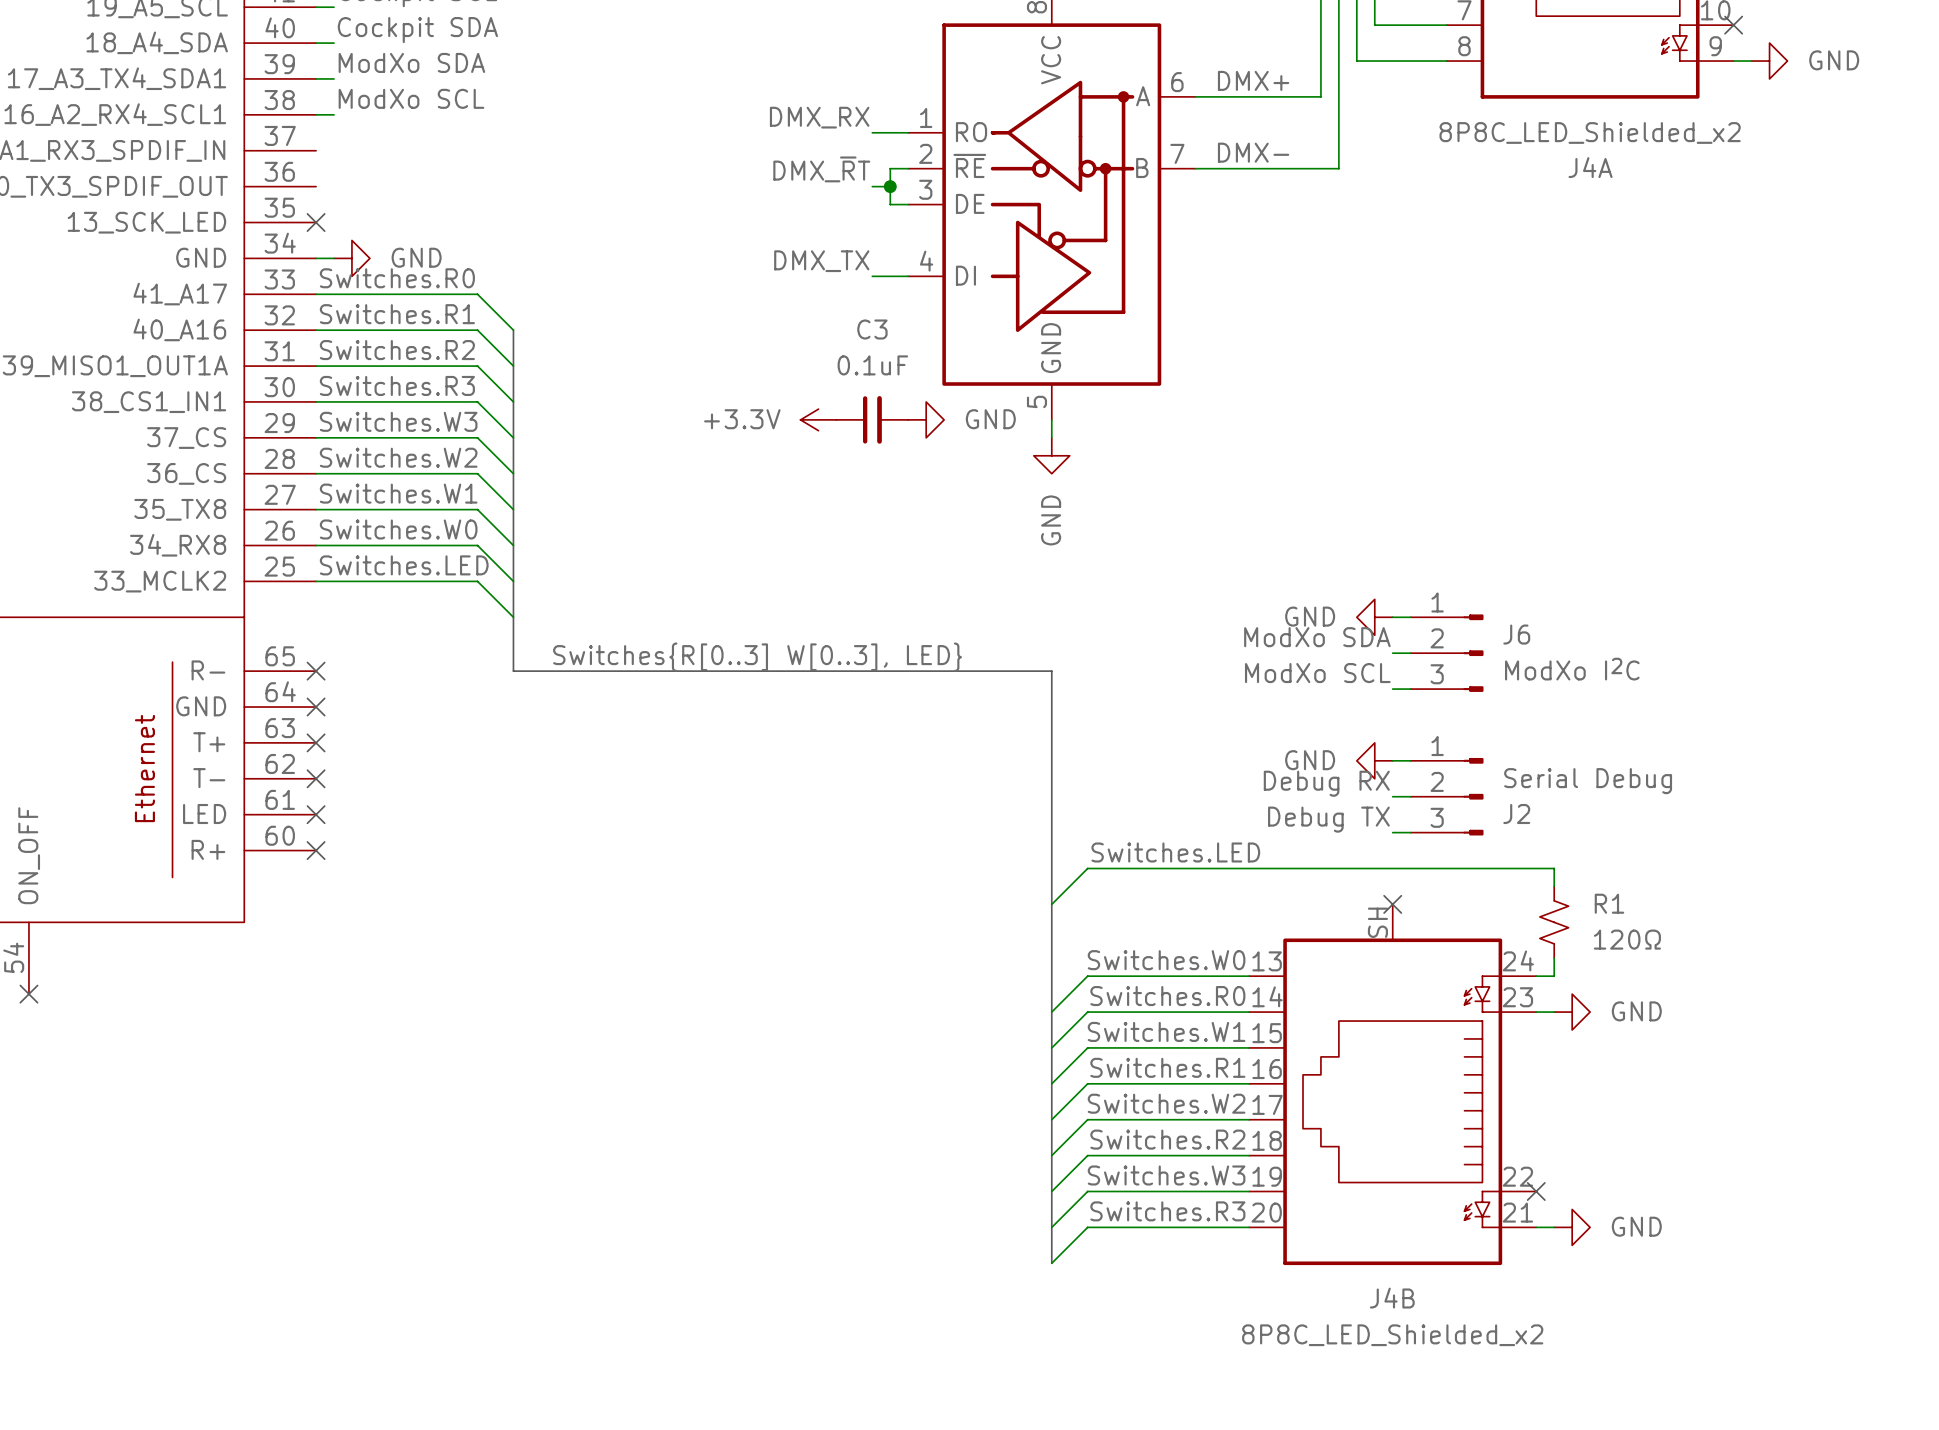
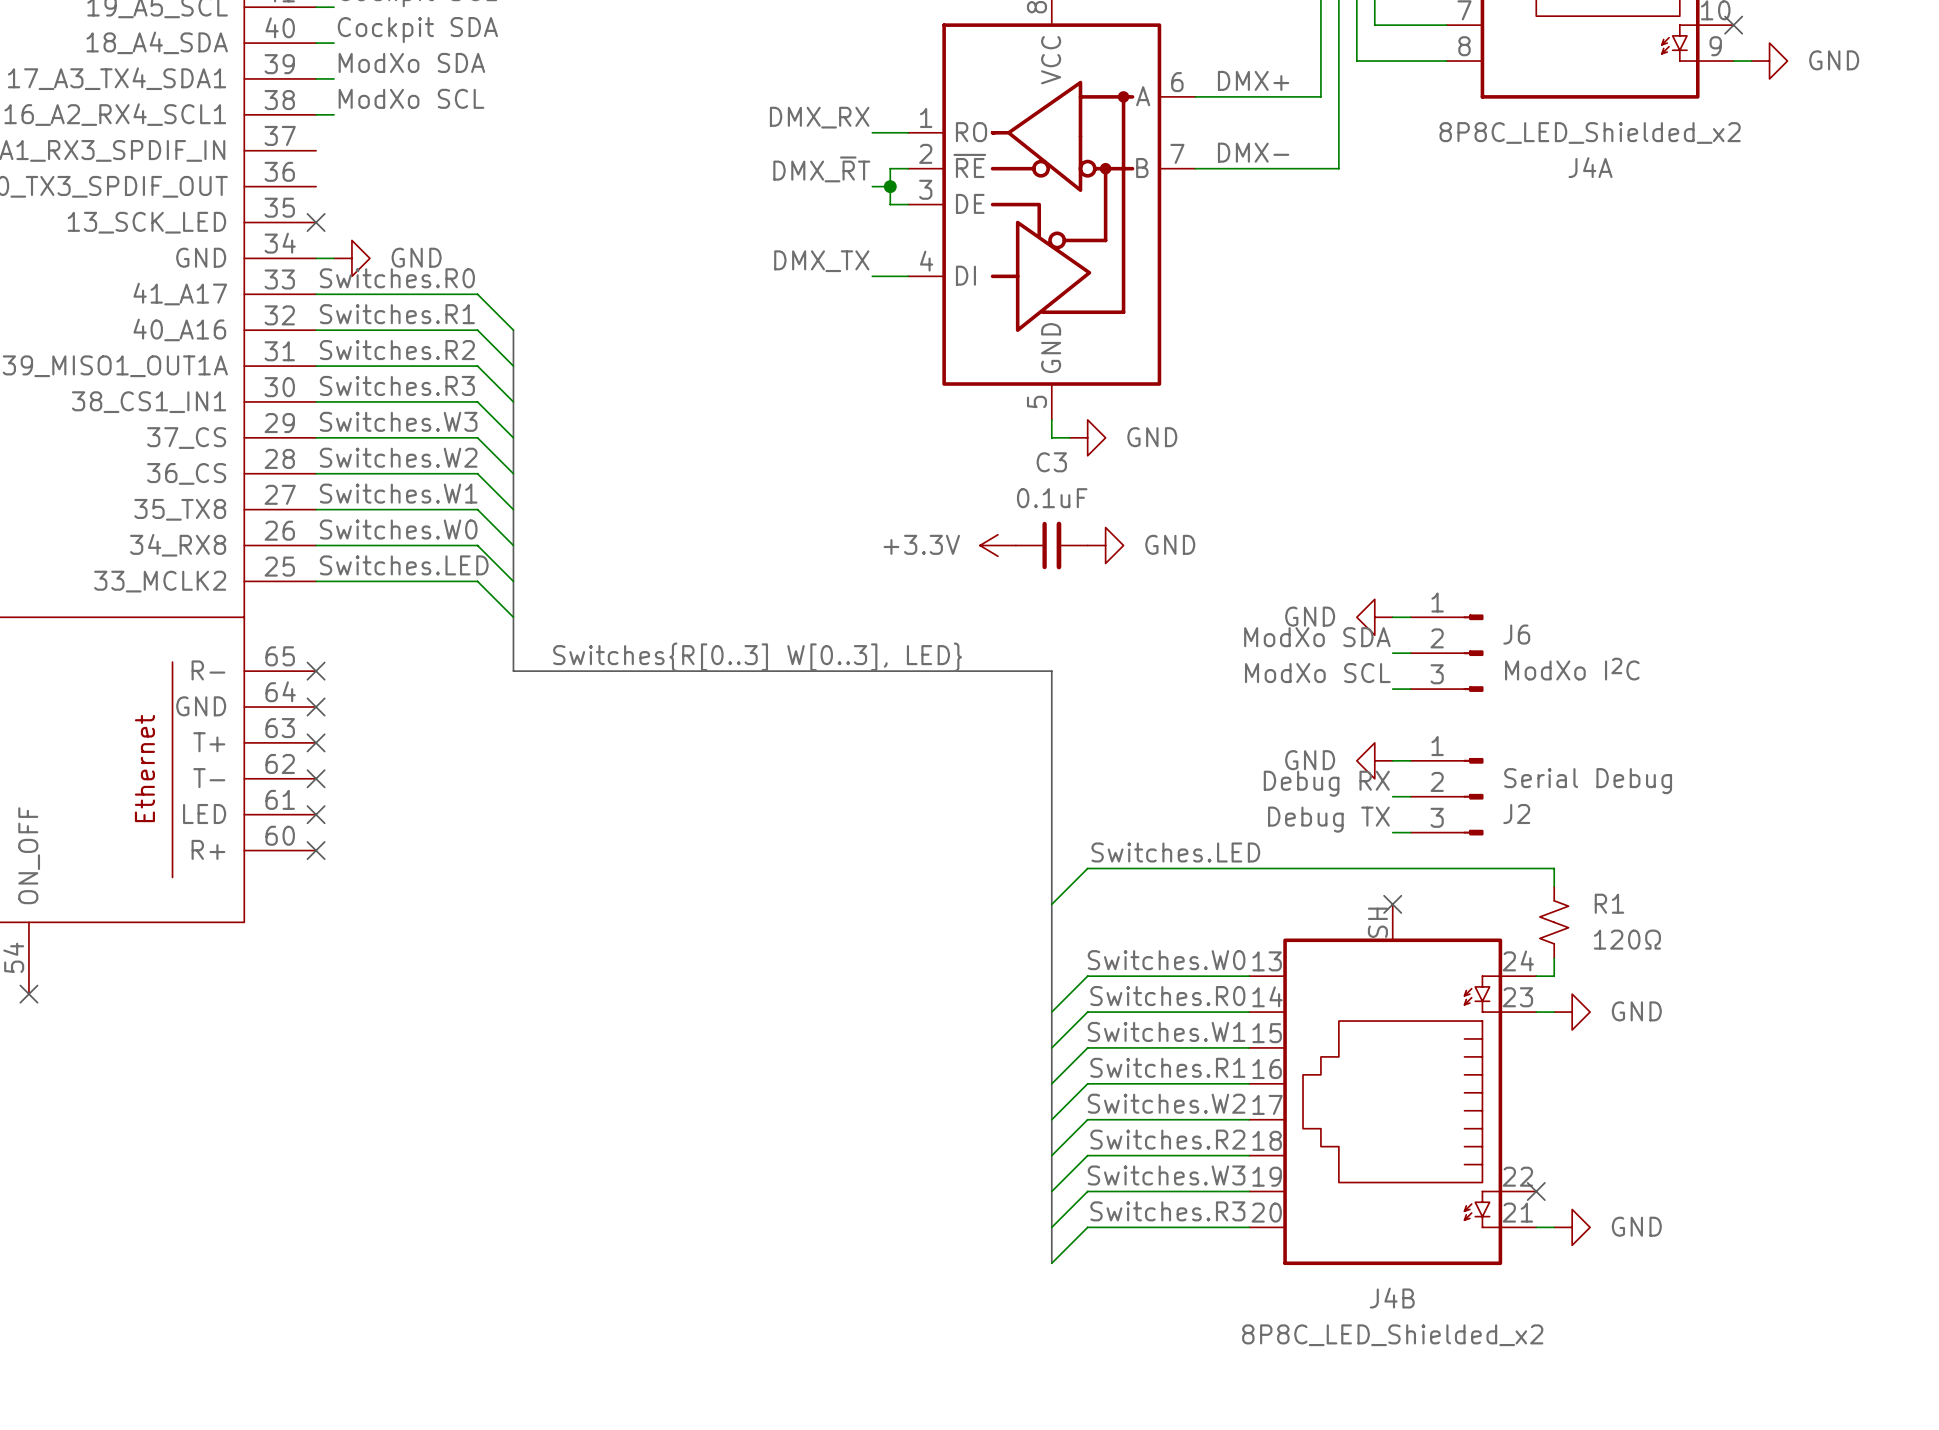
C3 name position: C3 (872, 329) -> C3 (1051, 462)
C3 value position: 0.1uF (872, 365) -> 0.1uF (1052, 498)
power symbol position: +3.3V (818, 419) -> +3.3V (997, 545)
C3 position: (872, 419) -> (1051, 545)
power symbol: GND (926, 419) -> none
wire: none -> (1051, 437) (1069, 437)
power symbol rotation: 0° (1051, 455) -> 90° counterclockwise (1087, 437)
power symbol position: GND (1051, 455) -> GND (1087, 437)
power symbol: none -> GND (1105, 545)

